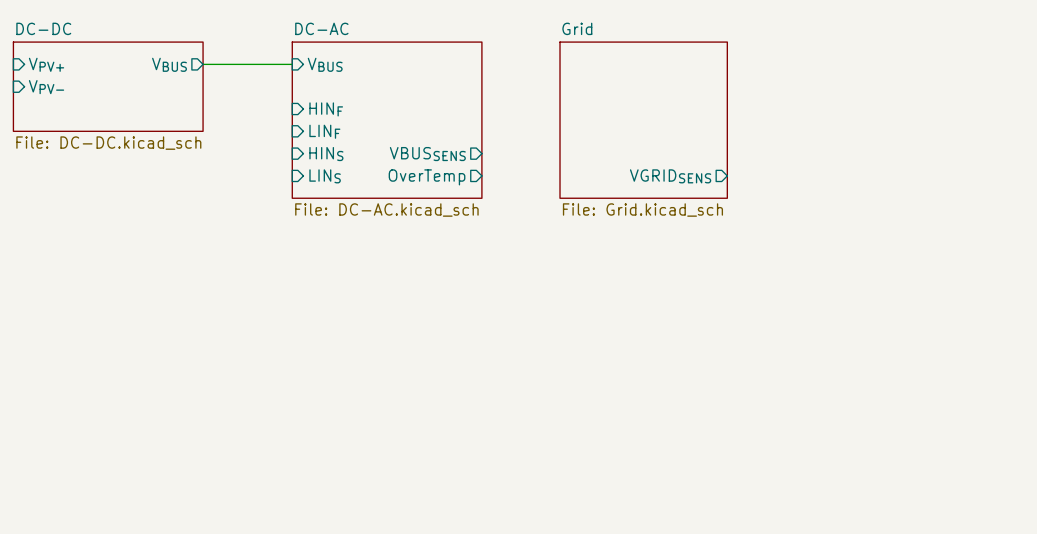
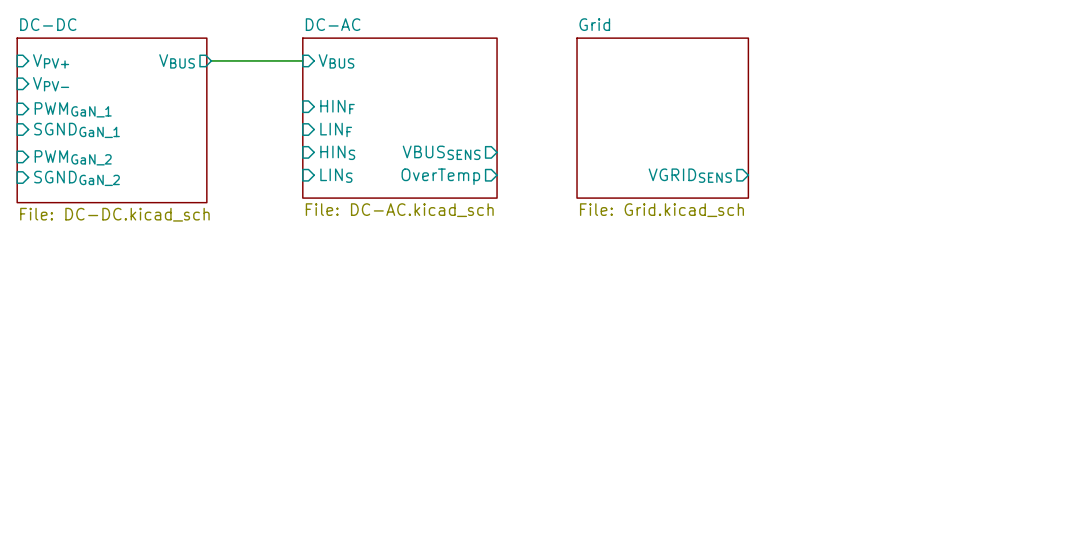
sheet DC-DC: File: DC-DC.kicad_sch (108, 86) -> none
sheet pin: none -> PWMGaN_1 (73, 109)
sheet DC-DC: none -> File: DC-DC.kicad_sch (112, 120)
sheet pin: none -> SGNDGaN_1 (76, 130)
sheet pin: none -> PWMGaN_2 (73, 157)
sheet pin: none -> SGNDGaN_2 (76, 178)

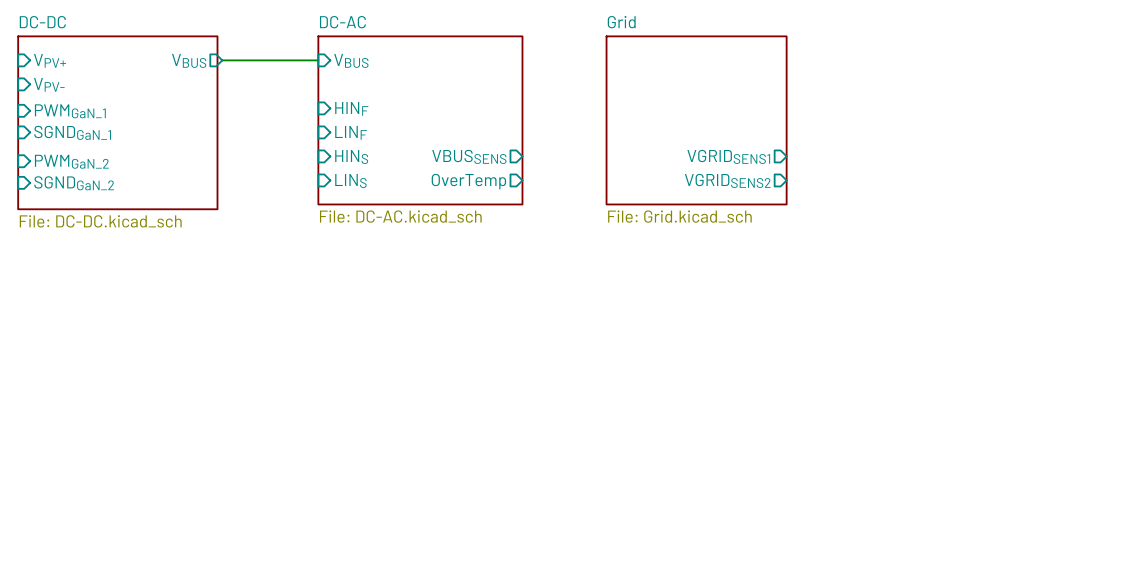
sheet pin: none -> VGRIDSENS1 (728, 156)
sheet pin: VGRIDSENS (690, 175) -> VGRIDSENS2 (727, 180)

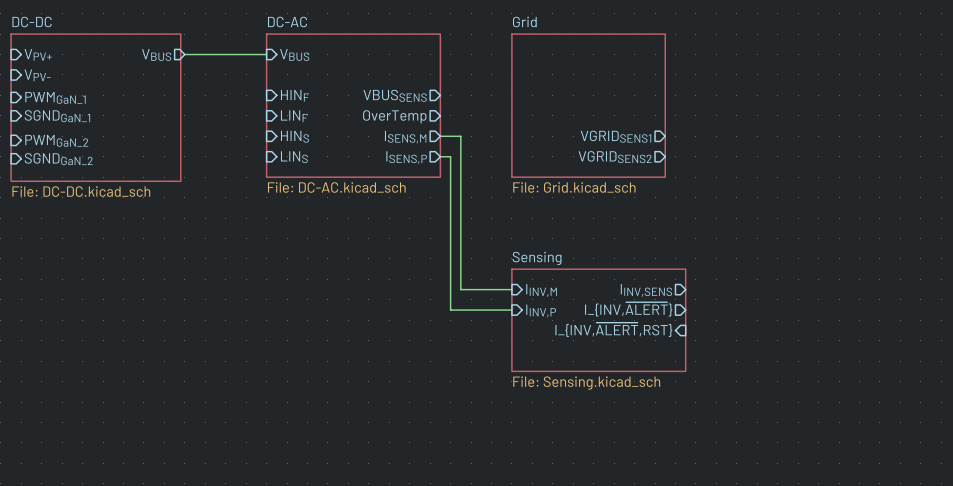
sheet pin: none -> VBUSSENS (395, 95)
sheet pin: none -> OverTemp (394, 116)
sheet pin: VBUSSENS (469, 156) -> ISENS,M (405, 137)
wire: none -> (440, 136) (460, 136) (460, 289) (511, 289)
wire: none -> (440, 156) (450, 156) (450, 310) (511, 310)
sheet pin: OverTemp (468, 181) -> ISENS,P (406, 157)
sheet pin: none -> IINV,M (541, 290)
sheet pin: none -> IINV,SENS (646, 290)
sheet pin: none -> I_{INV,~{ALERT}} (628, 309)
sheet pin: none -> IINV,P (541, 310)
sheet Sensing: none -> File: Sensing.kicad_sch (598, 320)
sheet pin: none -> I_{INV,~{ALERT},RST} (613, 329)

